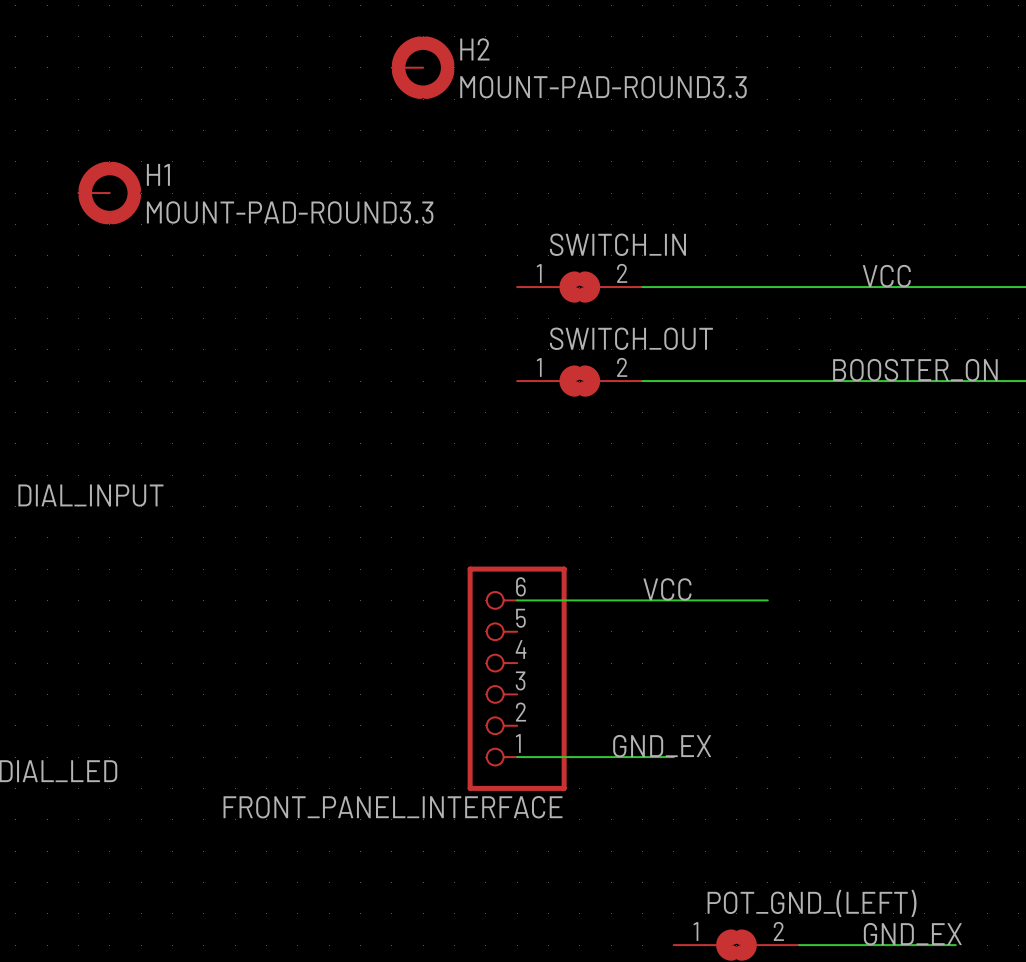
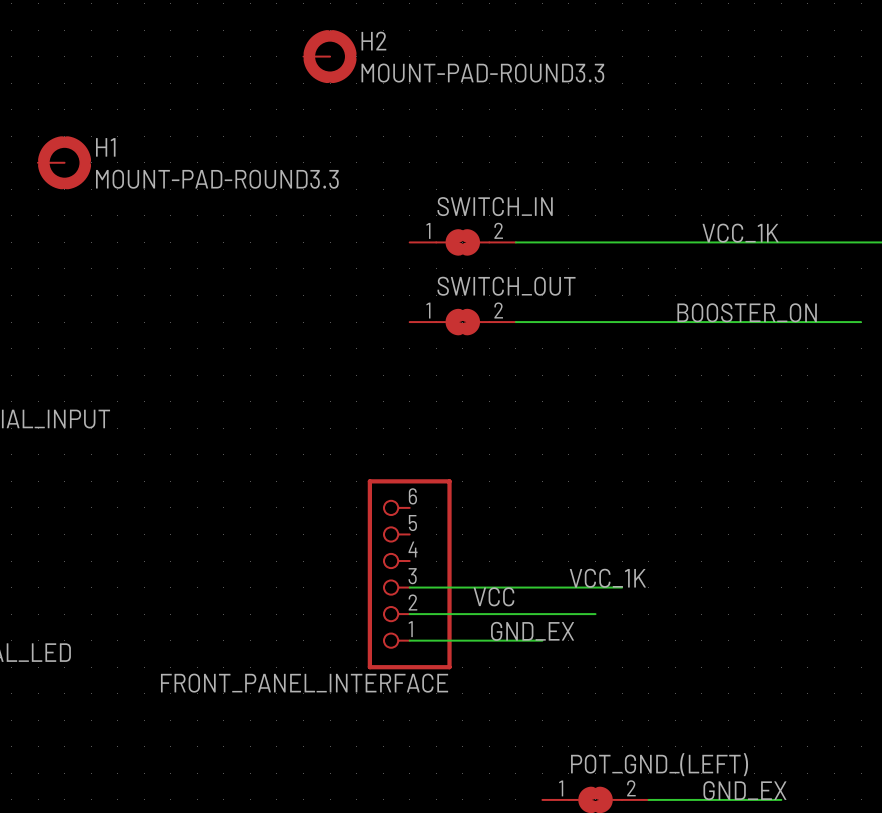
label: VCC (886, 276) -> VCC_1K (740, 233)
label position: VCC (667, 589) -> VCC (493, 596)
wire: (517, 600) (767, 600) -> (409, 587) (622, 587)
label: none -> VCC_1K (607, 578)
wire: none -> (409, 614) (595, 614)

